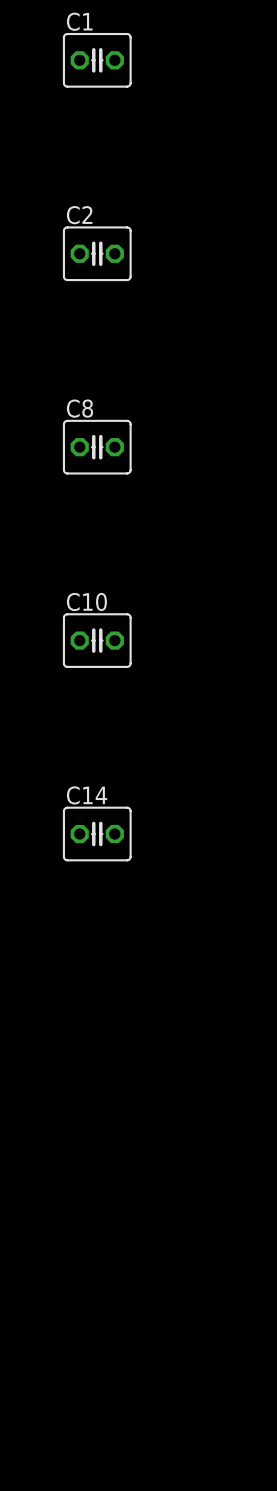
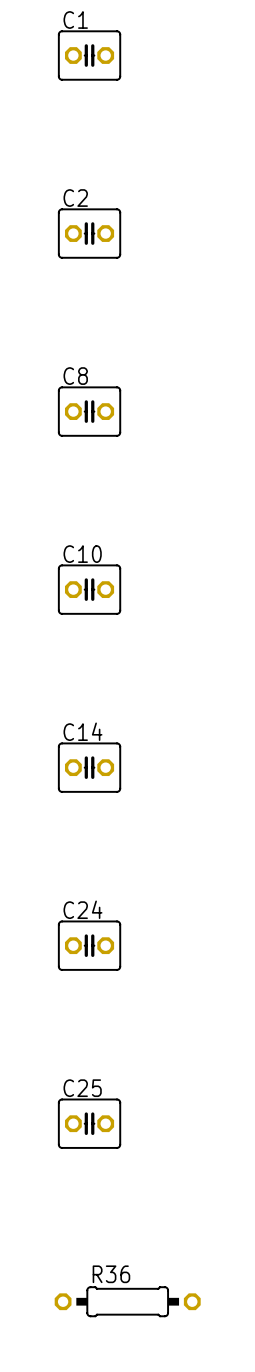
C24: none -> (89, 945)
C25: none -> (89, 1123)
R36: none -> (127, 1301)

